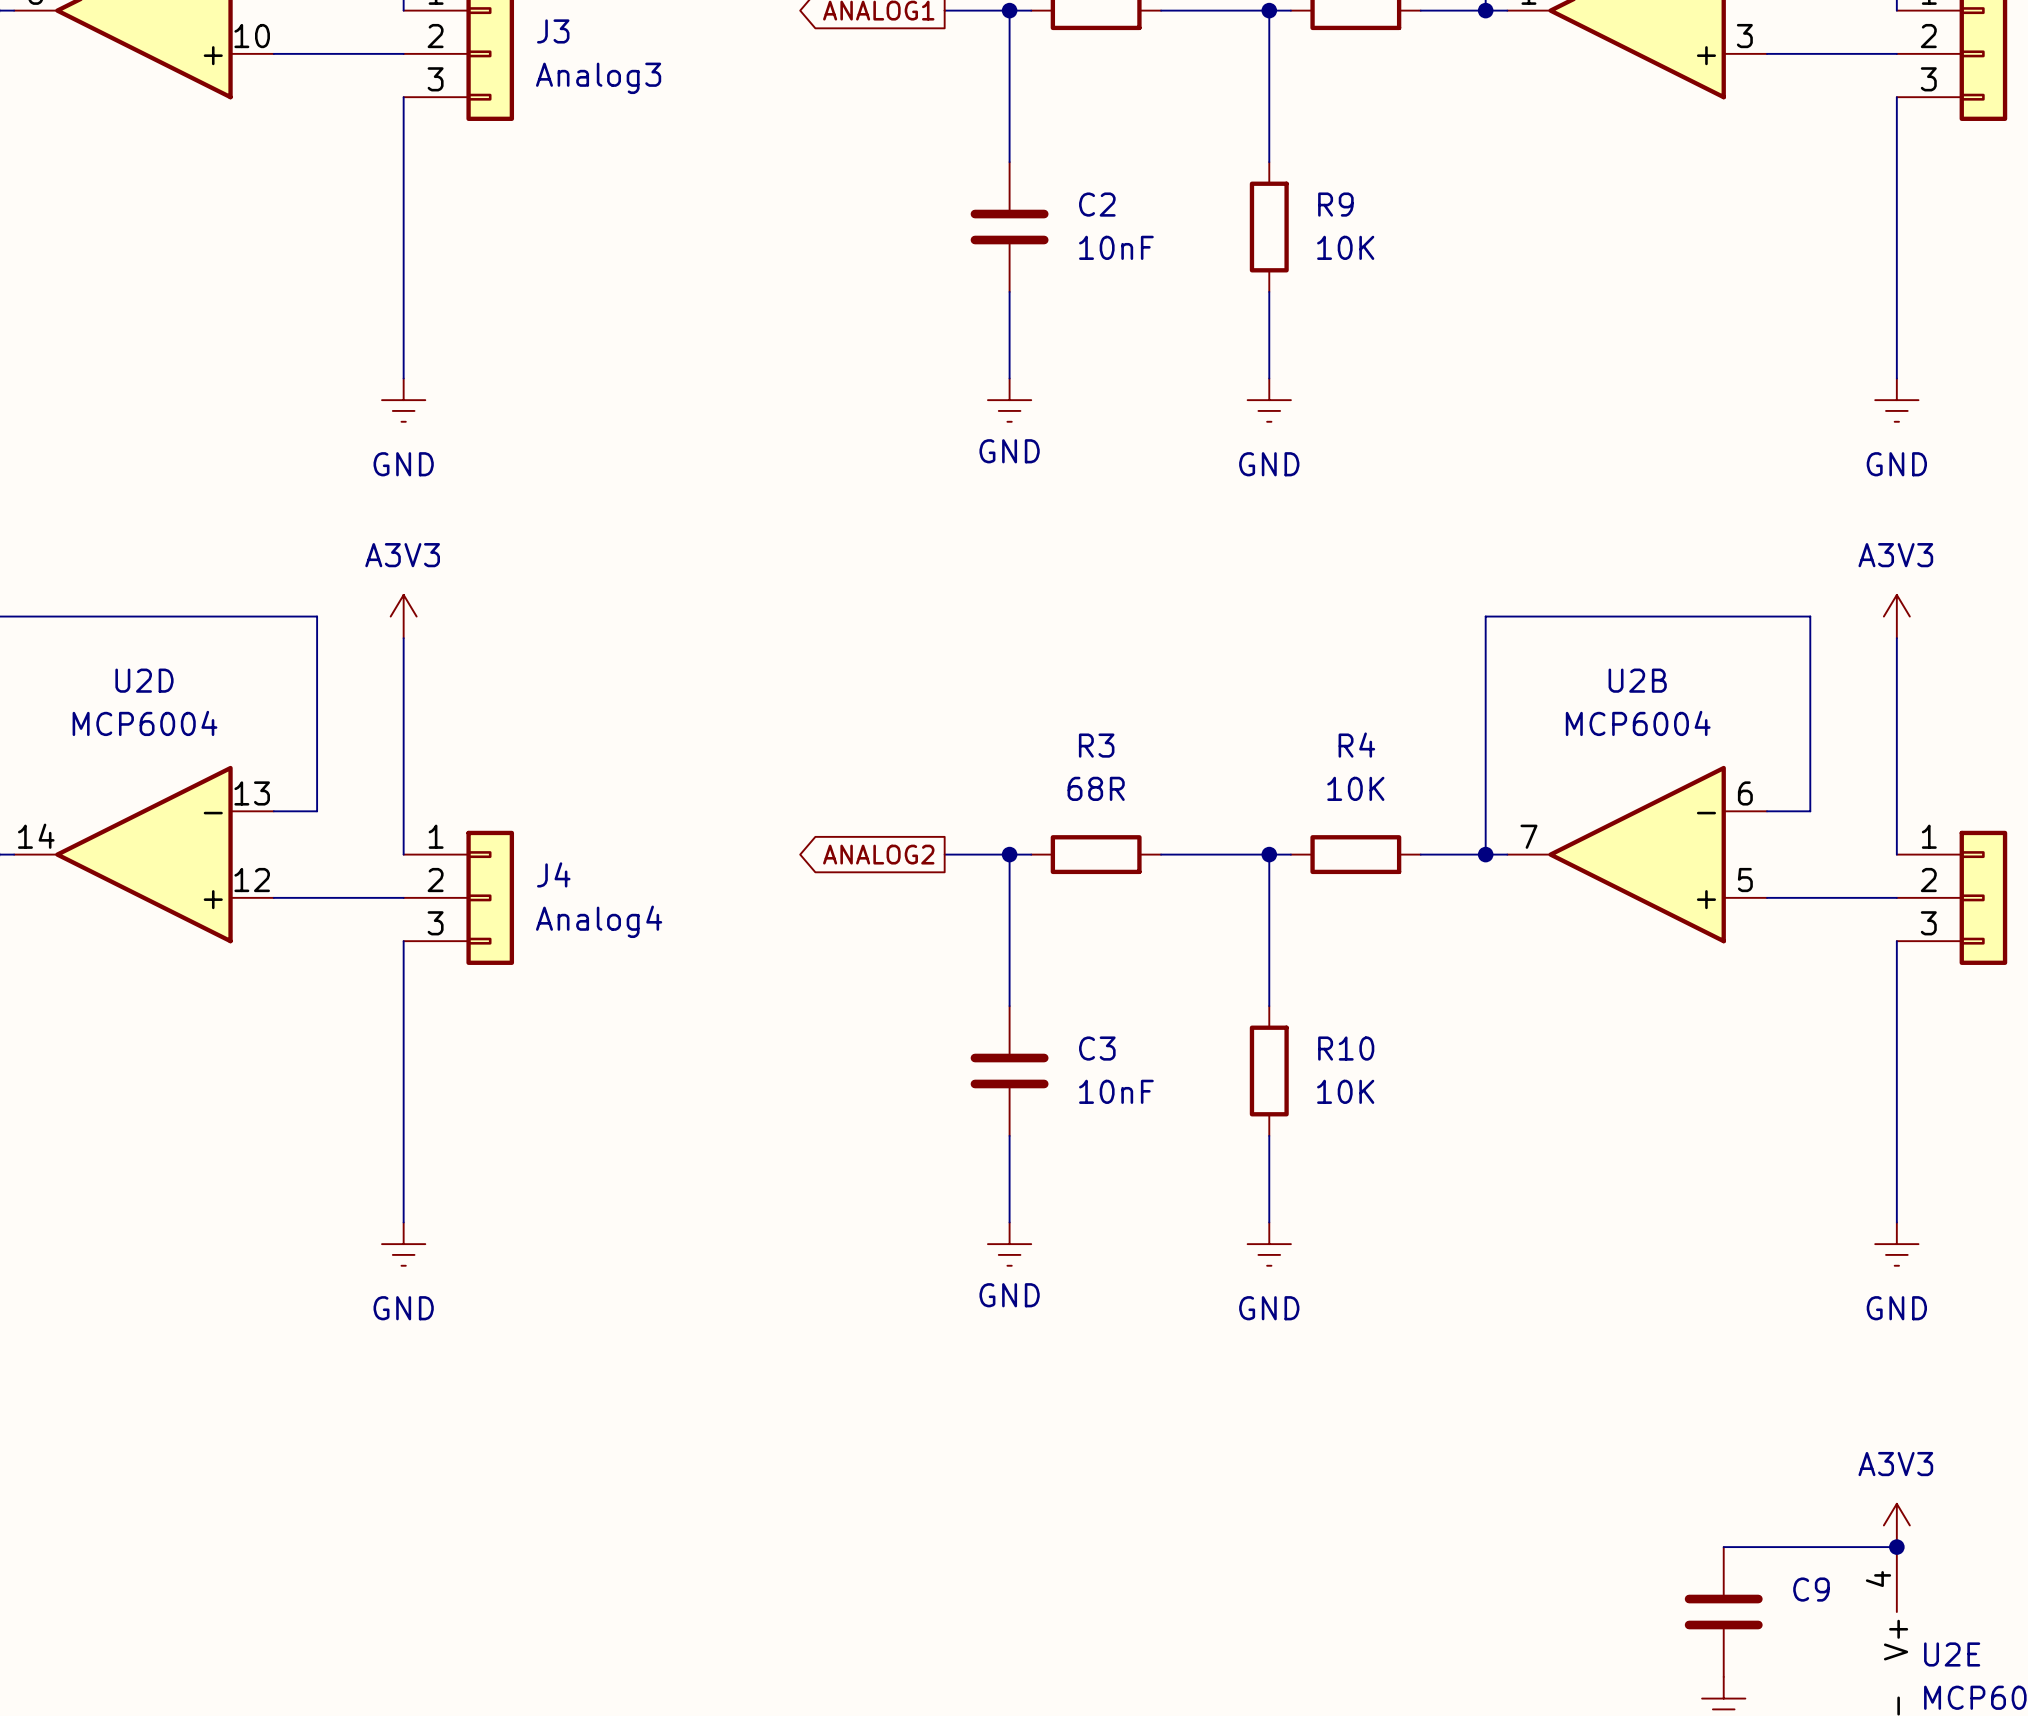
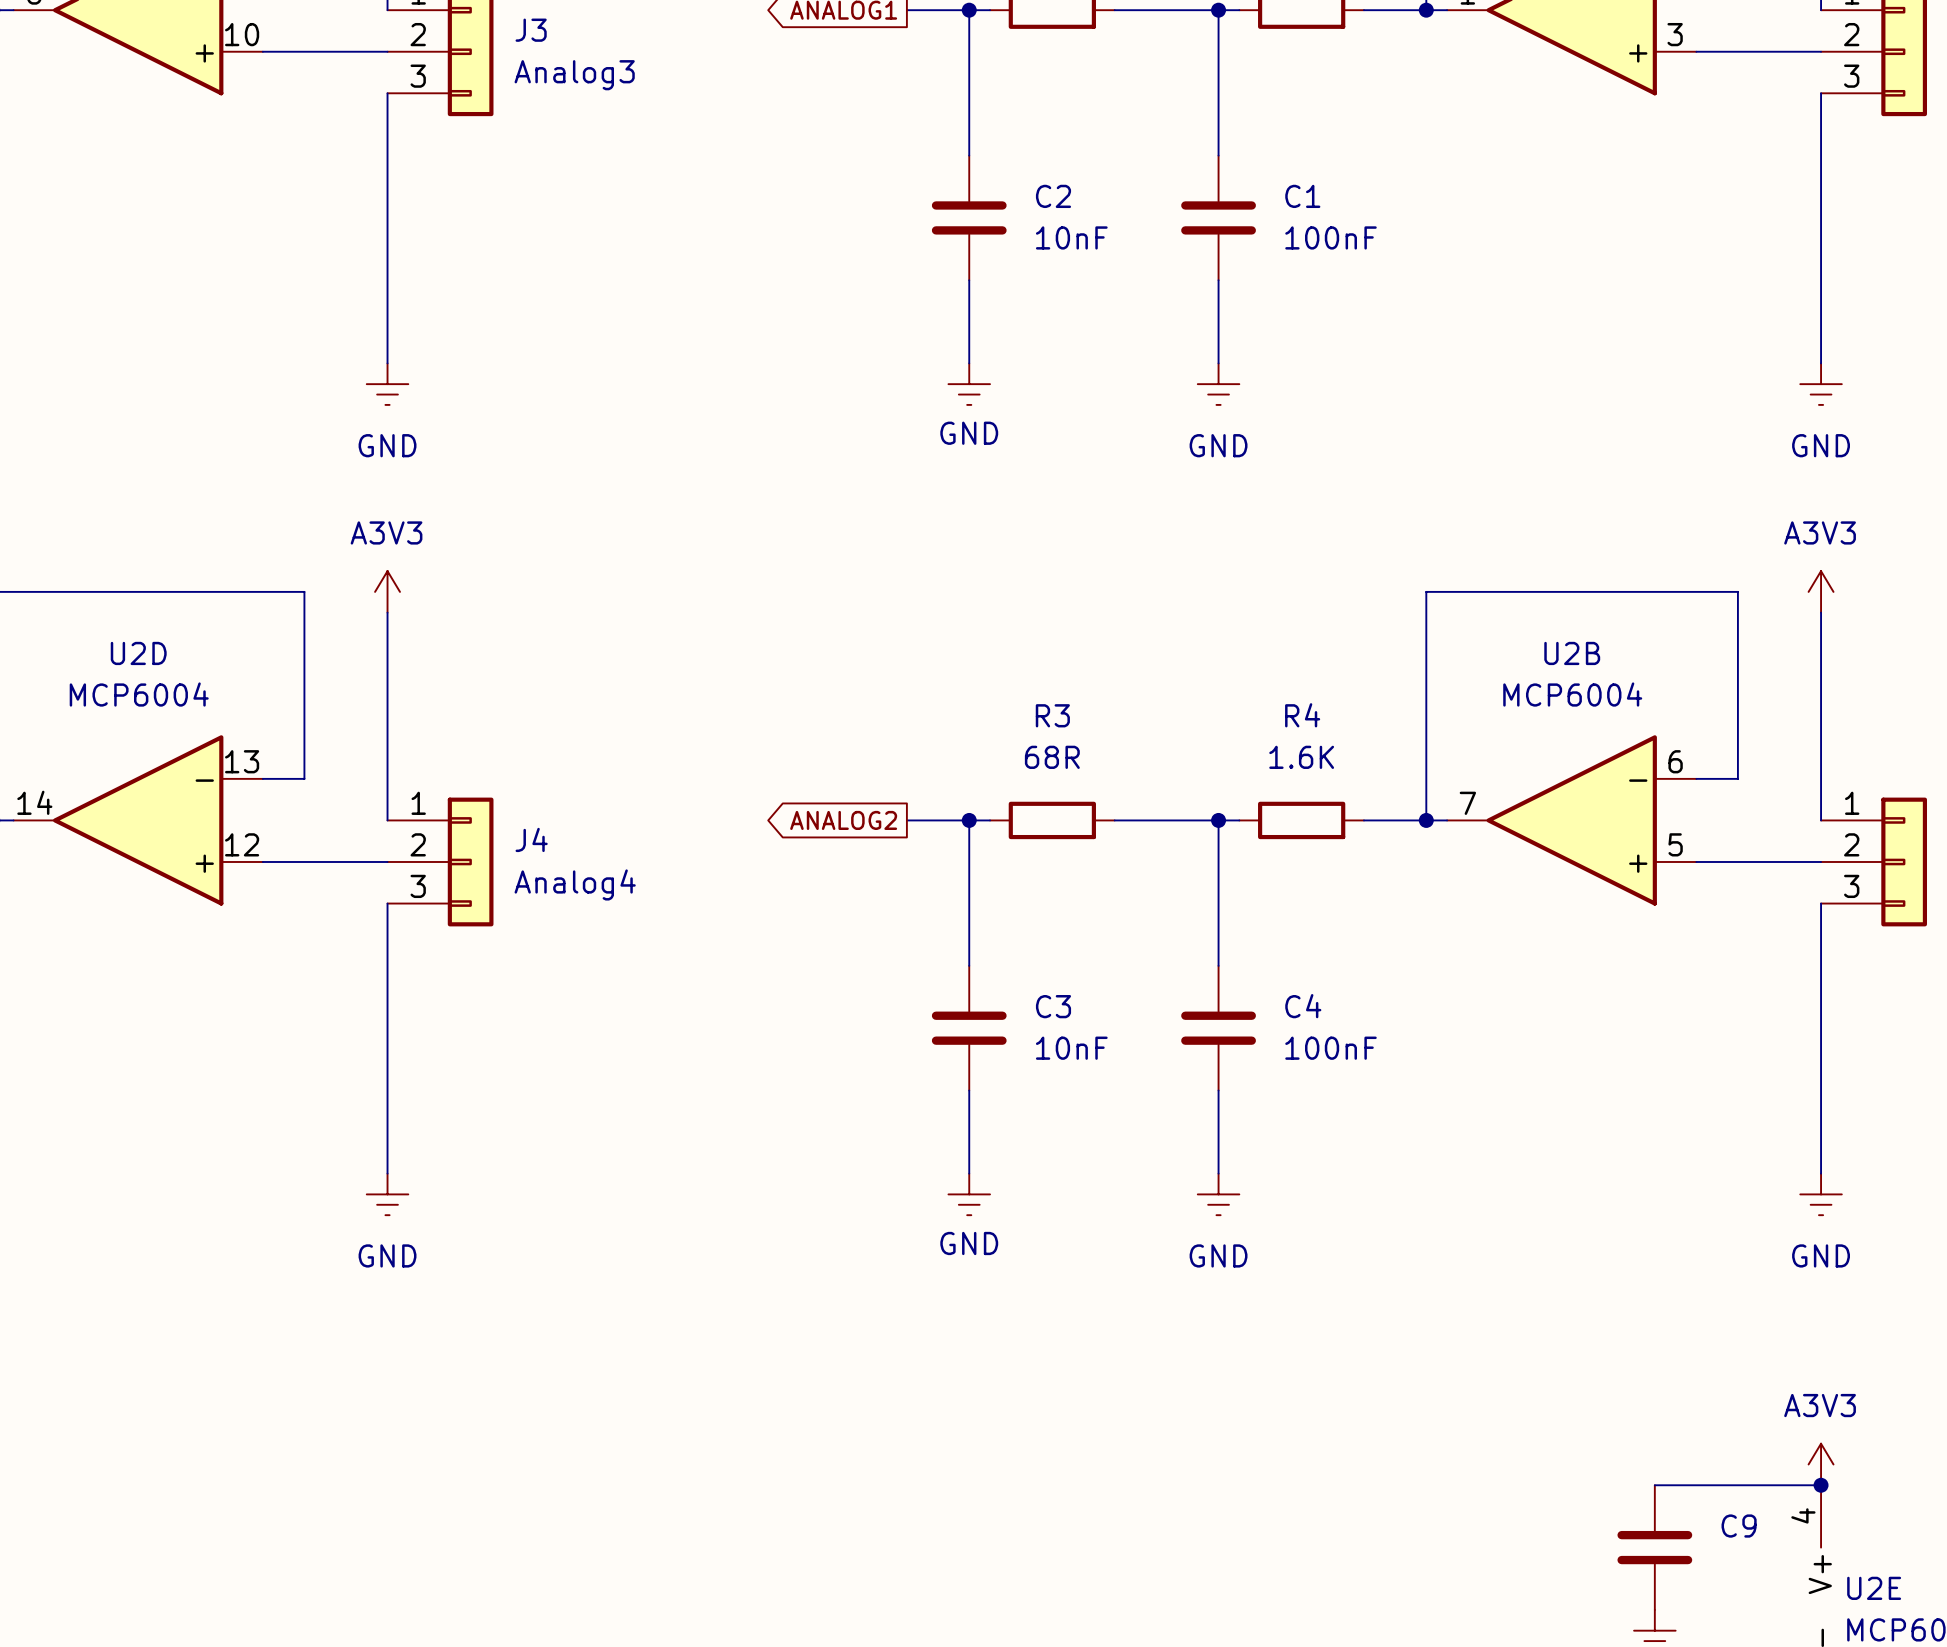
R9: 10K (1269, 227) -> none
C1: none -> 100nF (1218, 217)
R4 value: 10K (1355, 788) -> 1.6K (1301, 757)
R10: 10K (1269, 1071) -> none
C4: none -> 100nF (1218, 1028)

